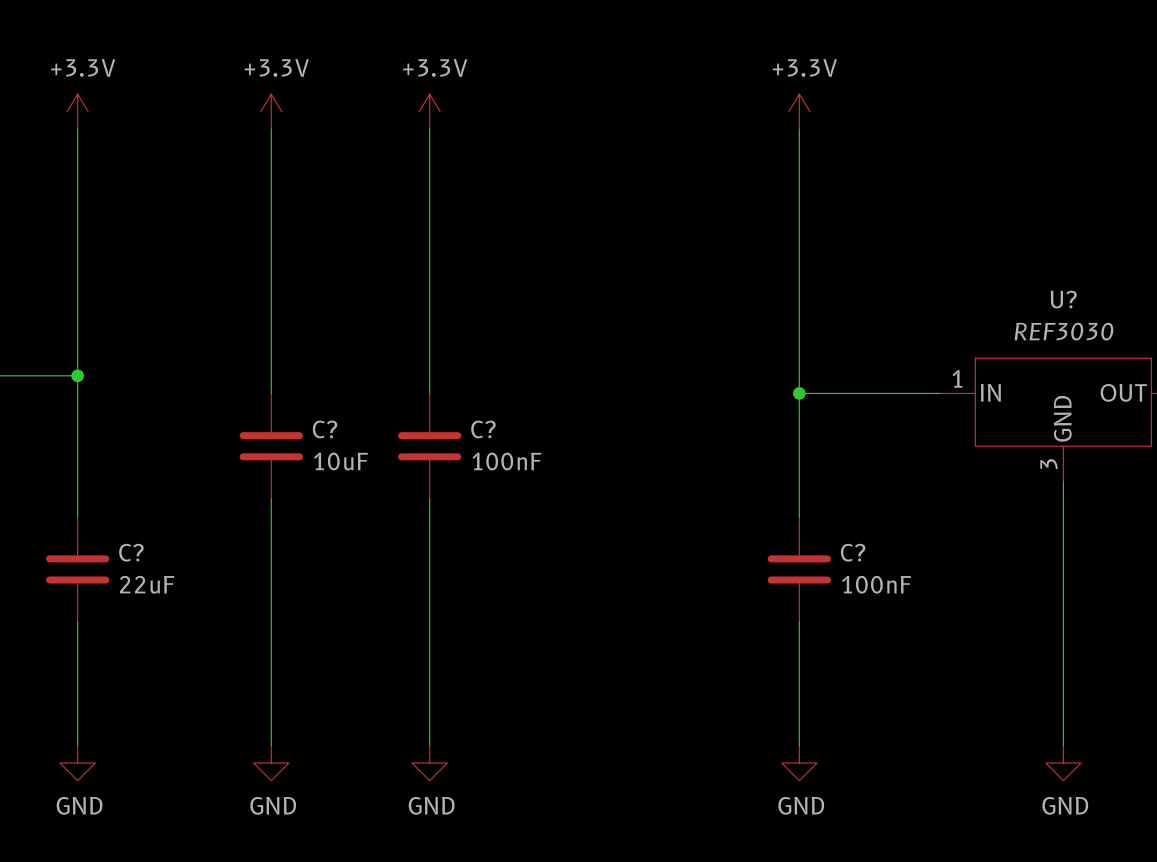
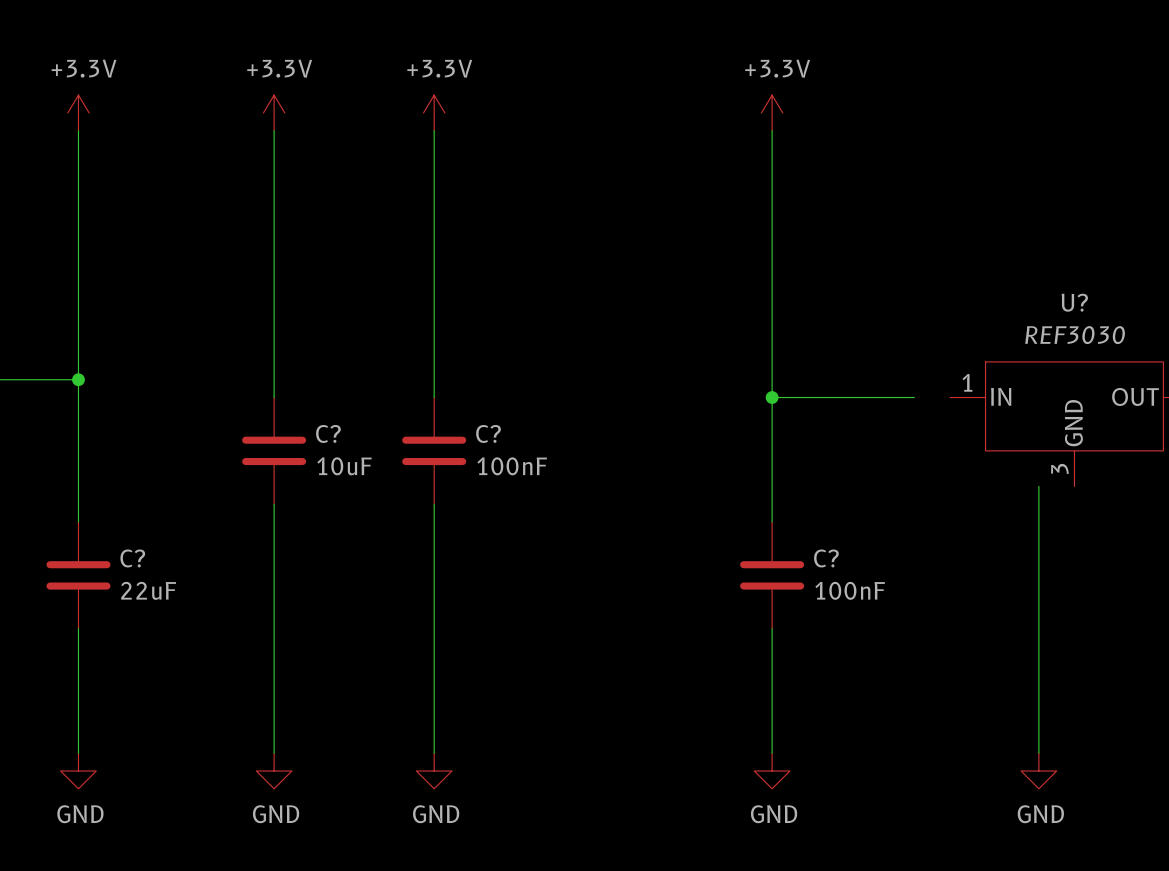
power symbol position: +3.3V (799, 111) -> +3.3V (772, 112)
wire: (799, 129) (799, 516) -> (772, 130) (772, 522)
junction position: (799, 393) -> (772, 397)
wire: (904, 393) (940, 393) -> (772, 397) (807, 397)
wire: (1063, 481) (1063, 745) -> (1038, 486) (1038, 753)
C? position: (799, 569) -> (772, 575)
wire: (799, 622) (799, 745) -> (772, 628) (772, 753)
power symbol position: GND (799, 763) -> GND (772, 771)
power symbol position: GND (1063, 763) -> GND (1038, 771)

